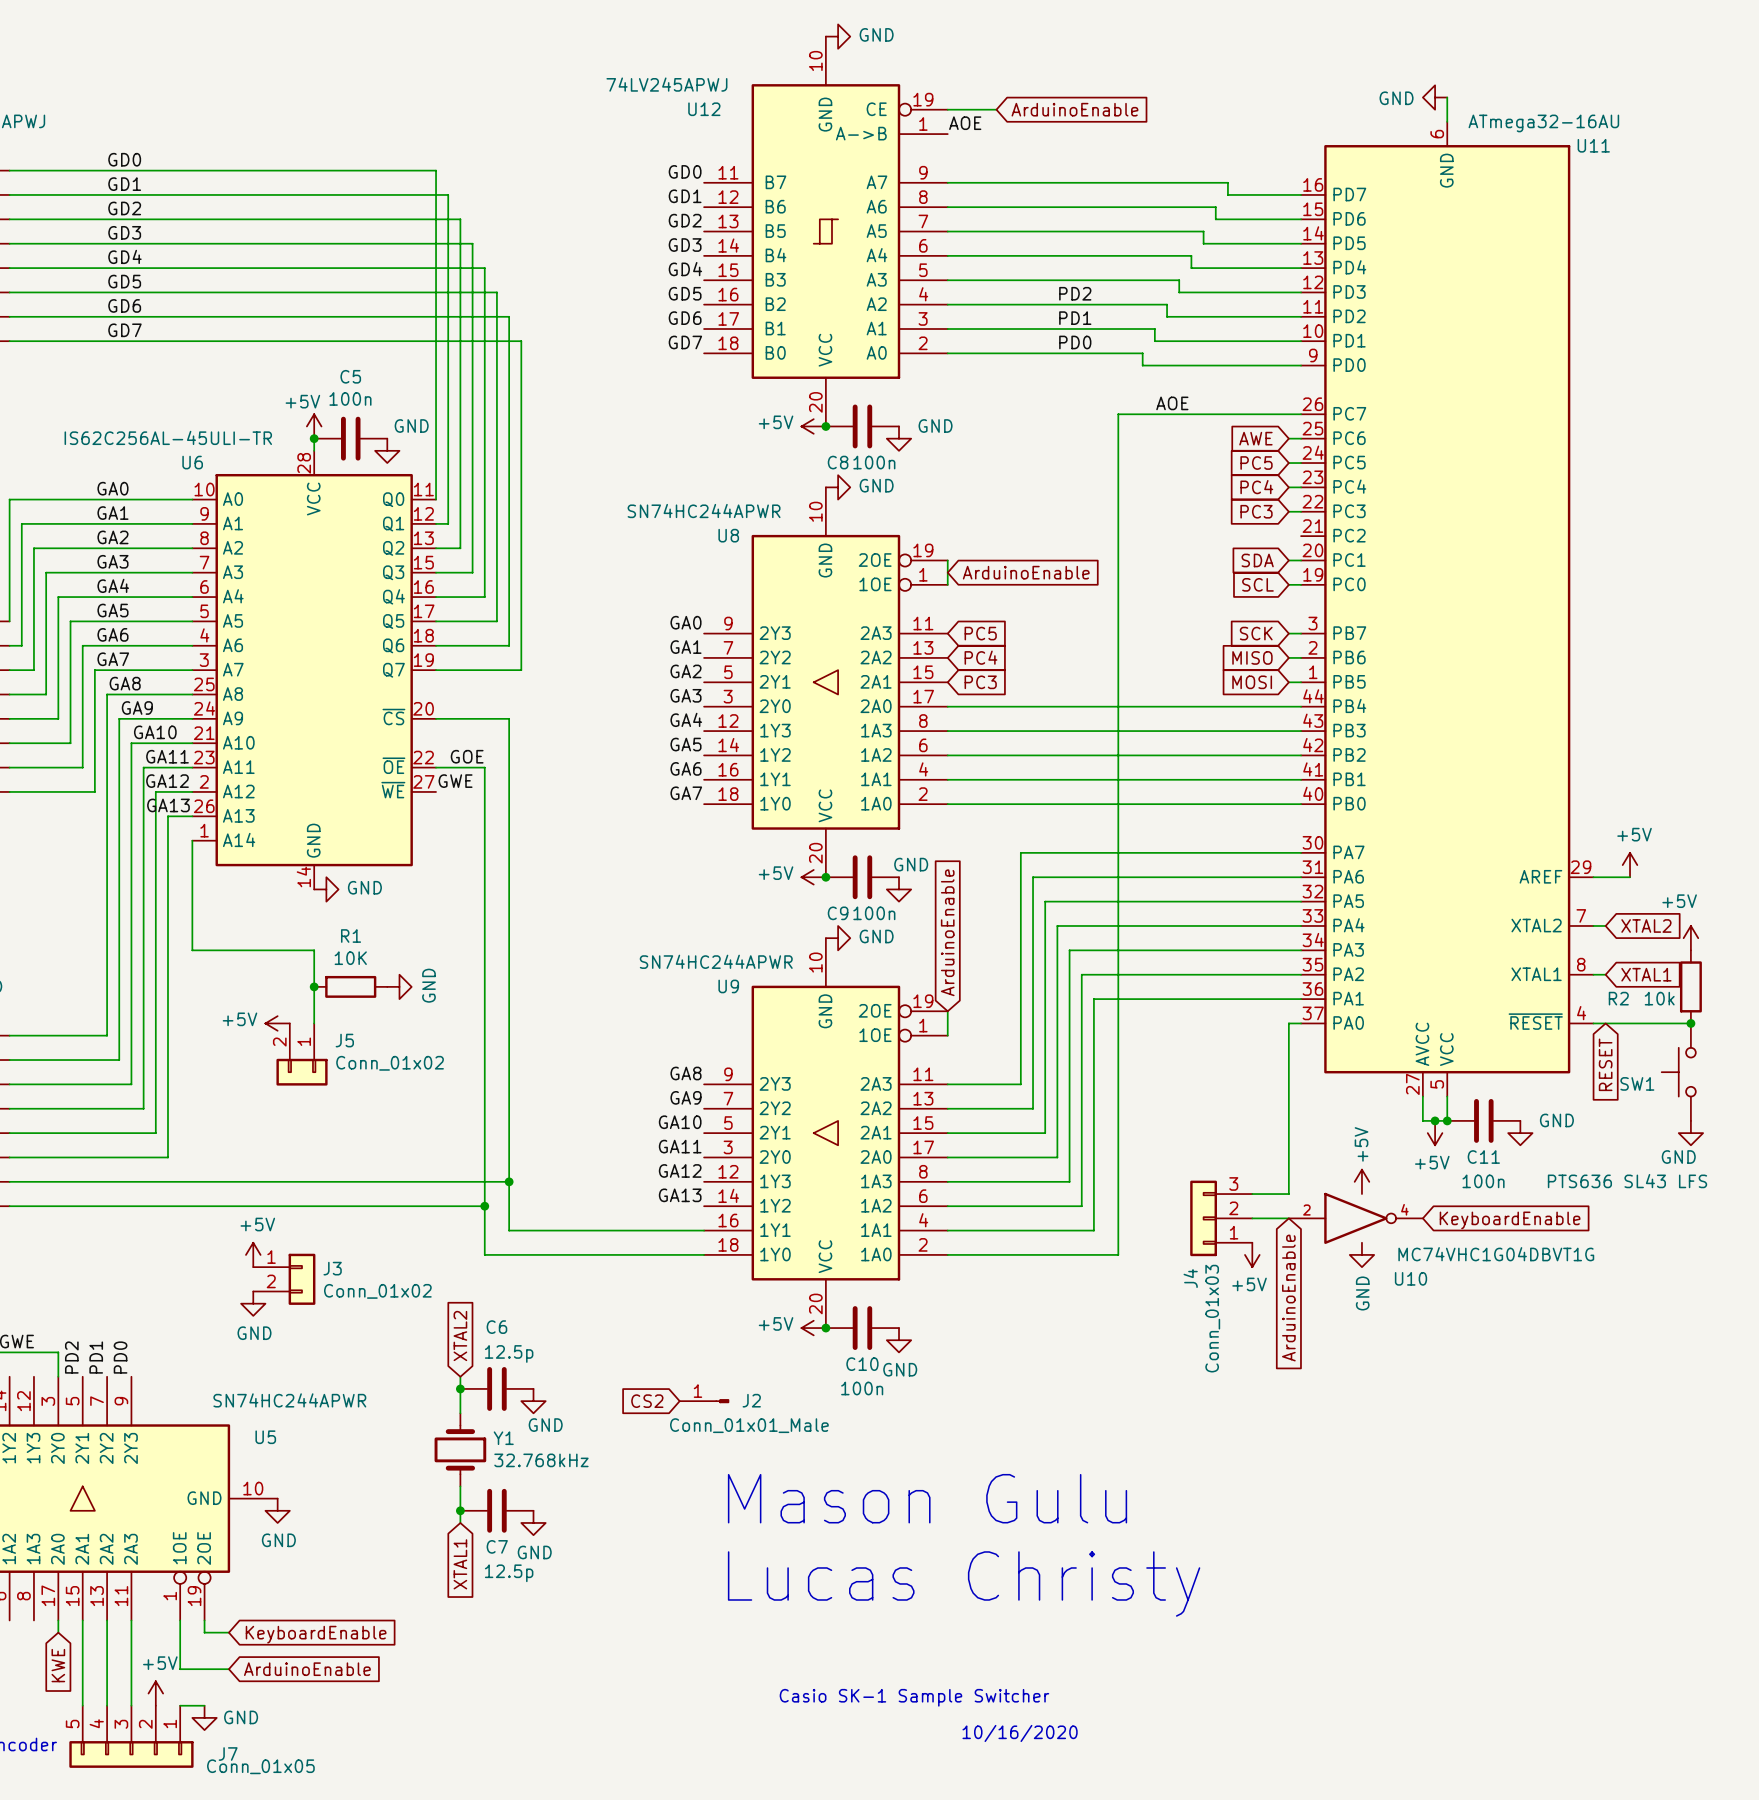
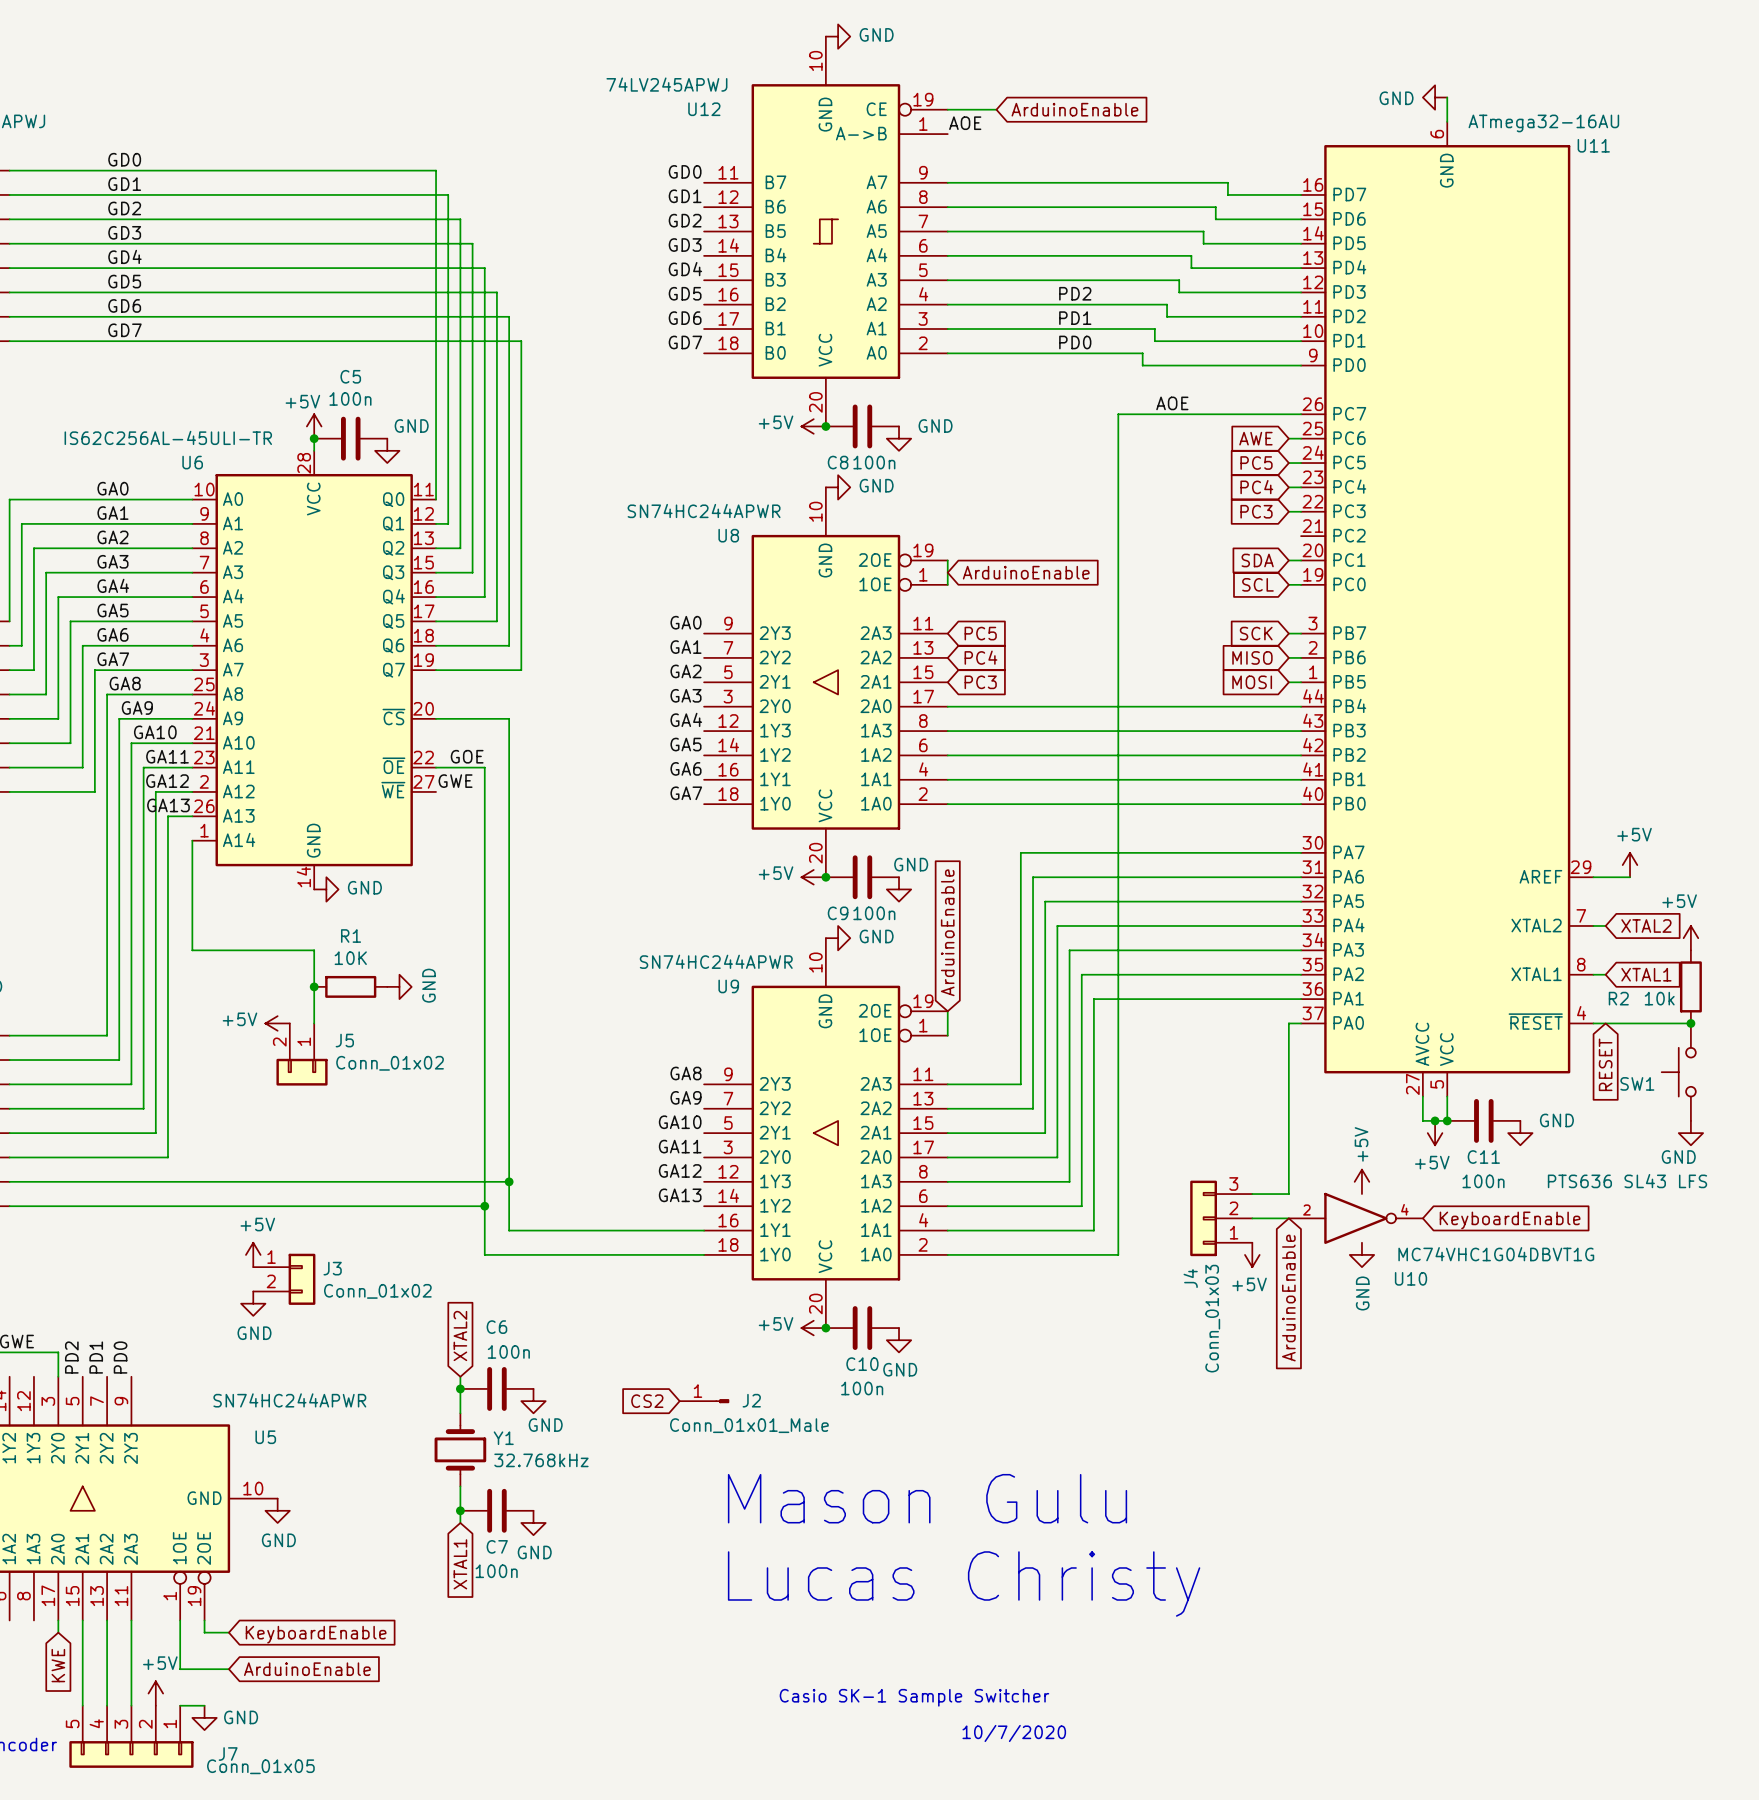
C6 value: 12.5p (509, 1353) -> 100n (508, 1351)
C7 value: 12.5p (509, 1573) -> 100n (496, 1571)
text: 10/16/2020 (1020, 1733) -> 10/7/2020 (1014, 1733)

